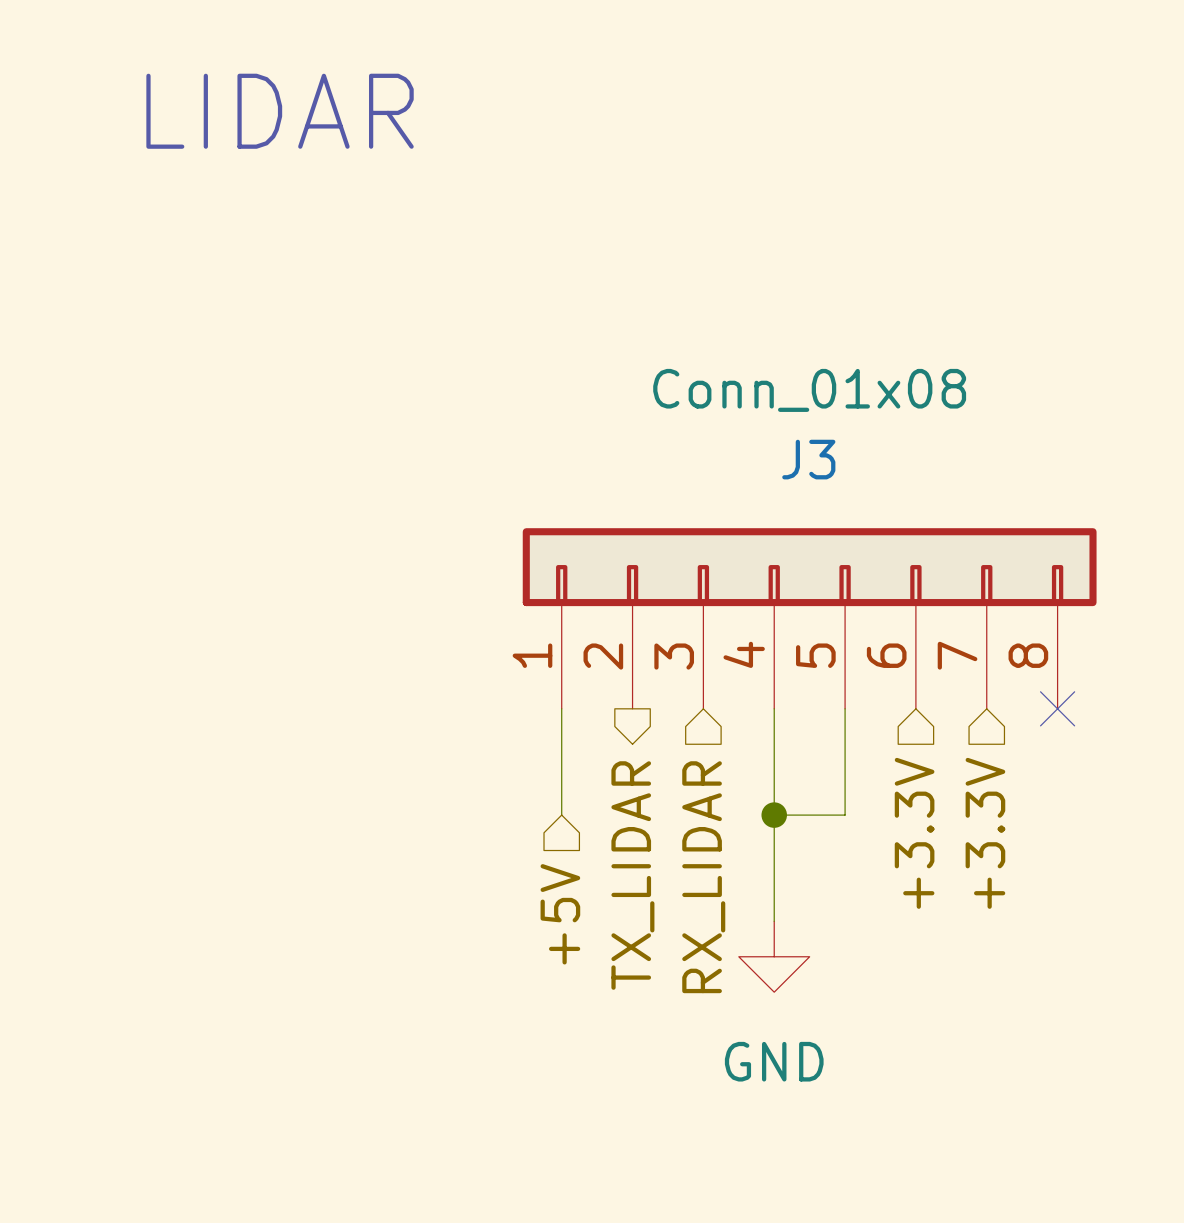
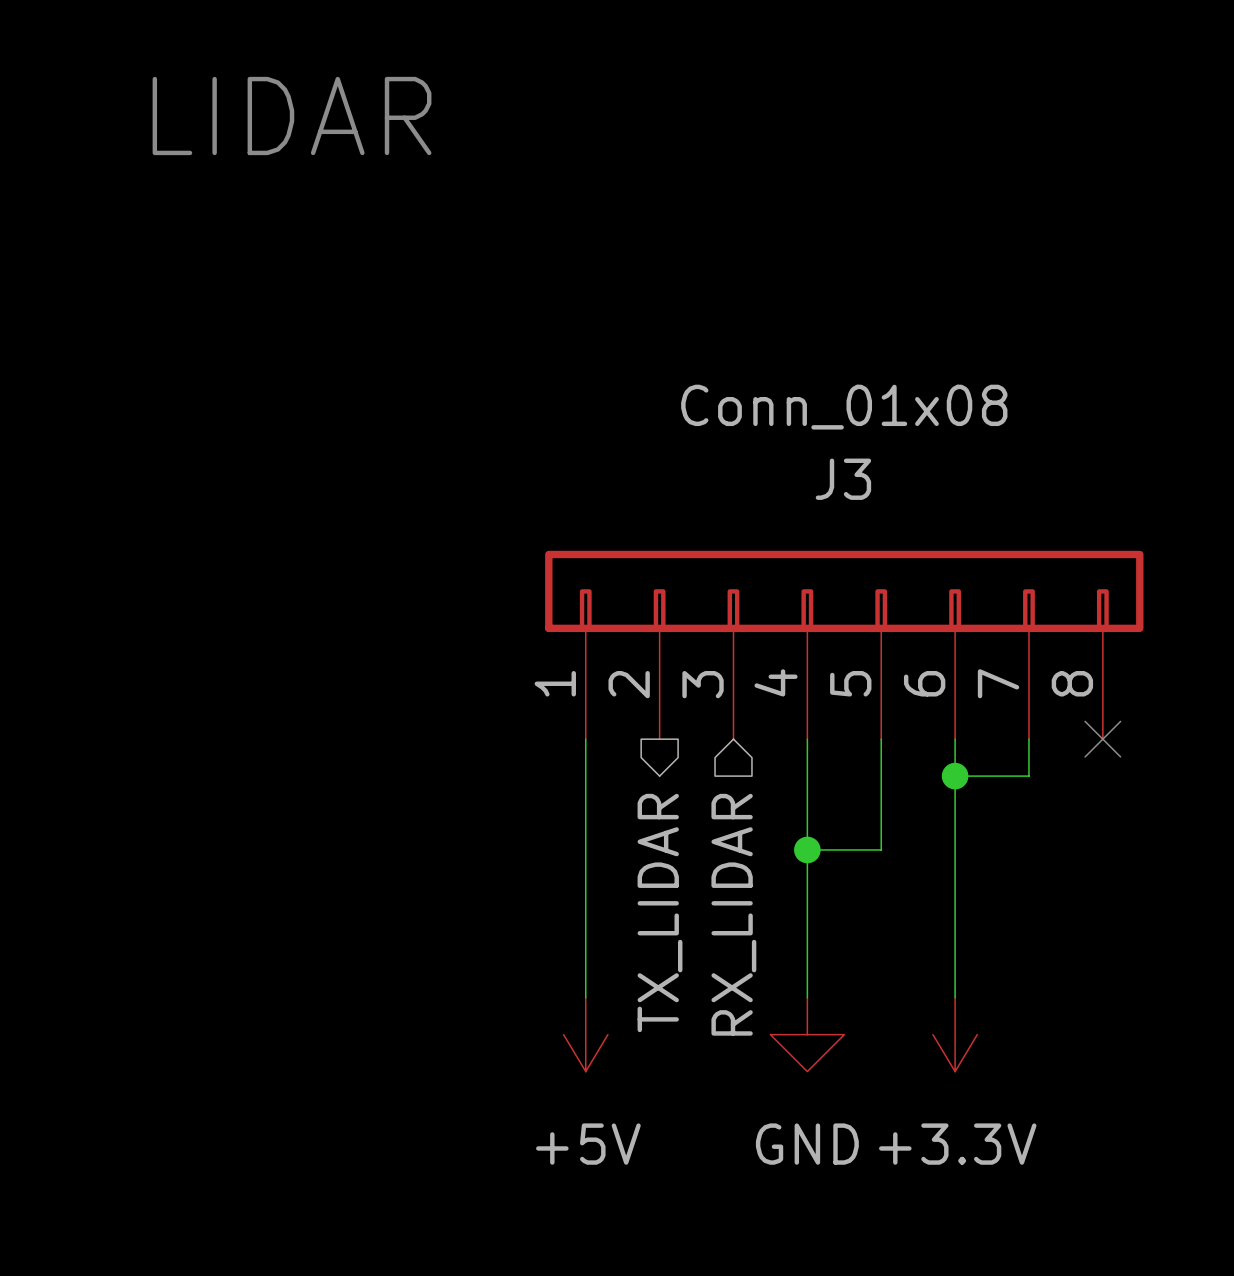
wire: none -> (955, 739) (955, 997)
wire: none -> (1028, 739) (1028, 776) (955, 776)
junction: none -> (955, 776)
wire: none -> (585, 849) (585, 997)
hierarchical label: +3.3V (914, 833) -> none
hierarchical label: +3.3V (985, 833) -> none
hierarchical label: +5V (560, 914) -> none
power symbol position: GND (774, 956) -> GND (807, 1034)
power symbol: none -> +5V (585, 1034)
power symbol: none -> +3.3V (955, 1034)

